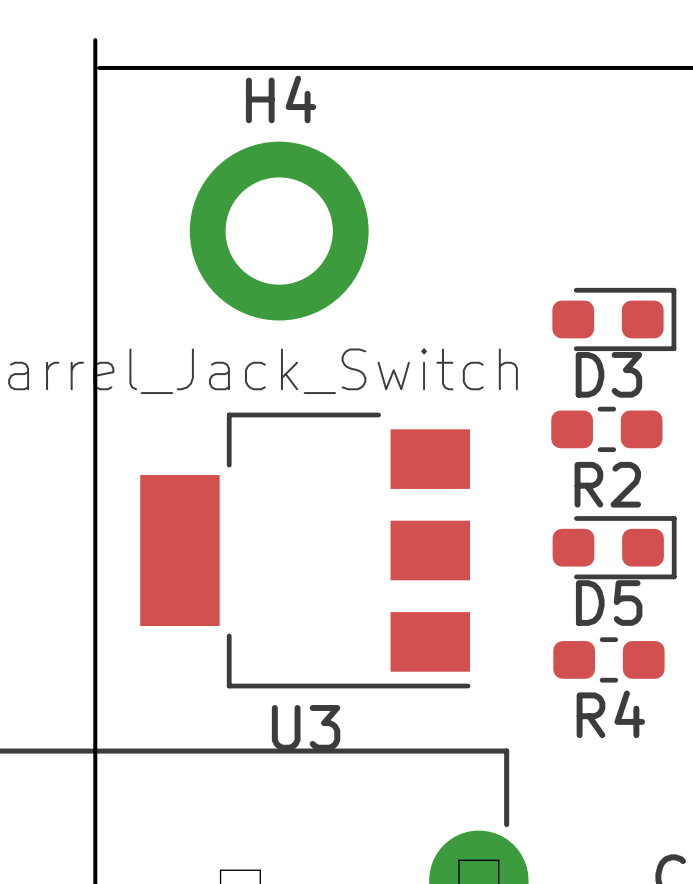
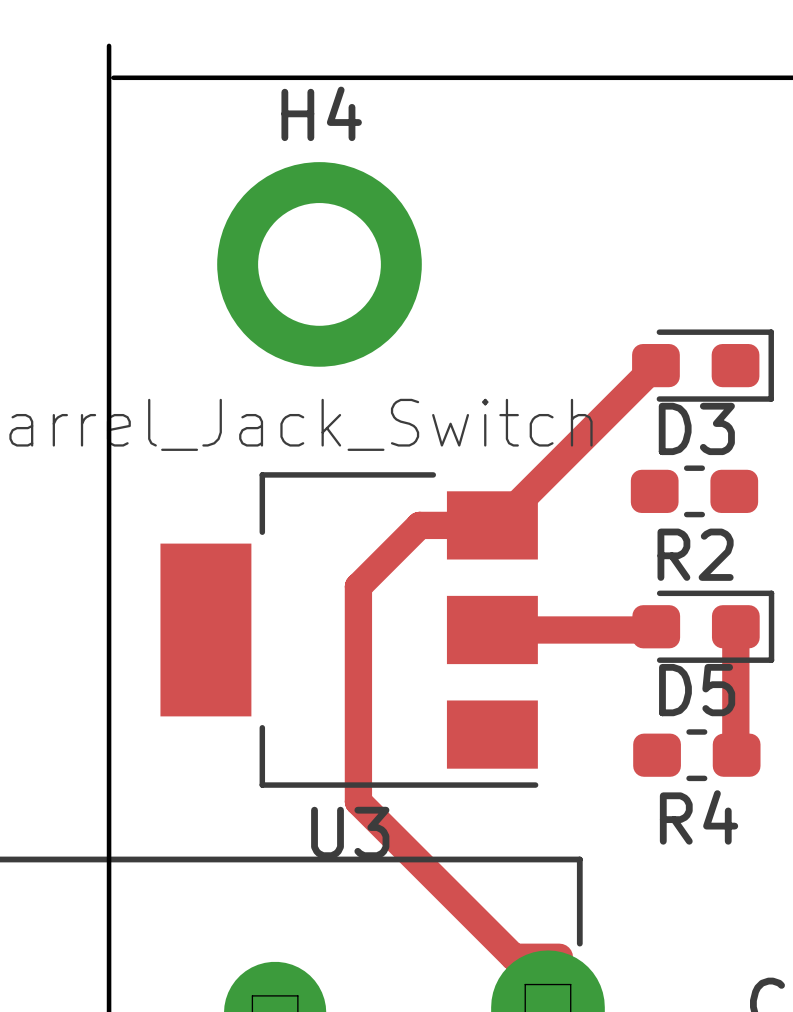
track: none -> (655, 365) (496, 525) (419, 525) (358, 586) (358, 801) (513, 957) (559, 957)
track: none -> (656, 626) (653, 629) (492, 629)
track: none -> (735, 626) (736, 755)

